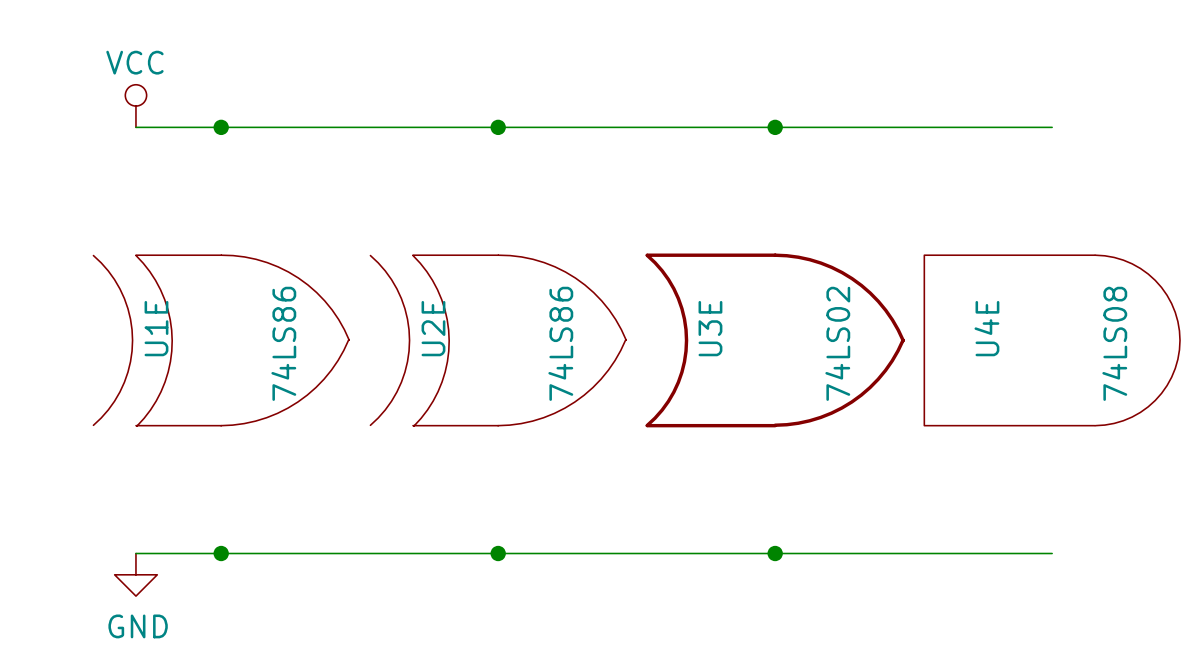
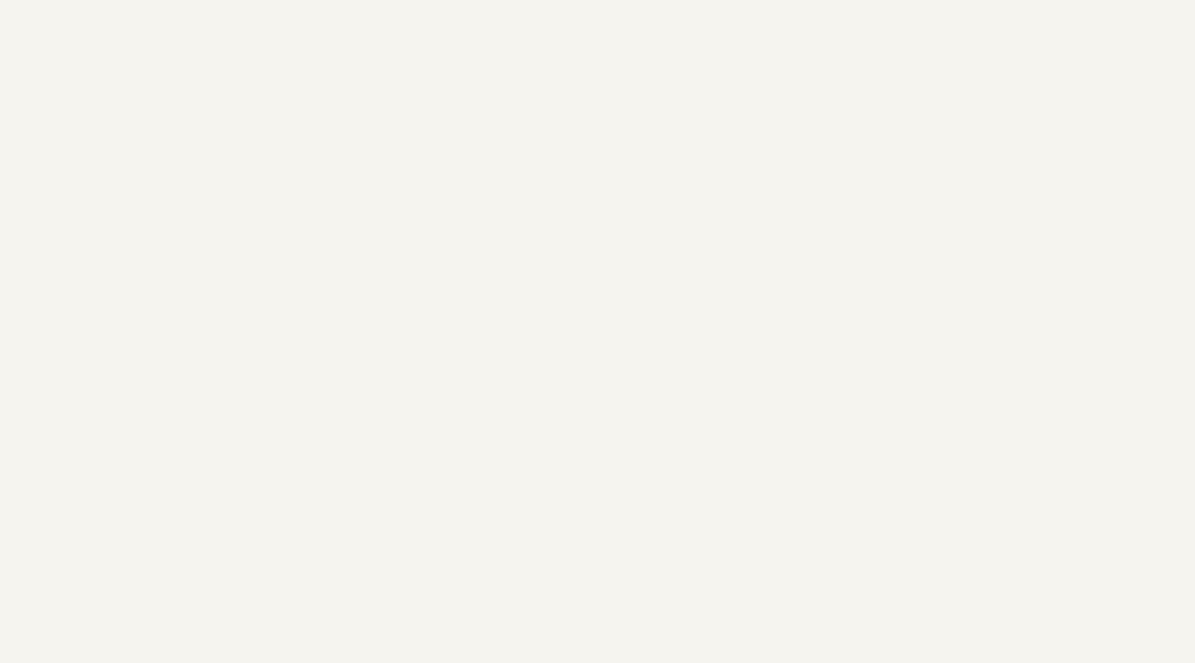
power symbol: VCC (135, 106) -> none
wire: (135, 127) (1052, 127) -> none
junction: (221, 127) -> none
junction: (498, 127) -> none
junction: (775, 127) -> none
U1E: 74LS86 (221, 340) -> none
U2E: 74LS86 (498, 340) -> none
U3E: 74LS02 (775, 340) -> none
U4E: 74LS08 (1052, 340) -> none
wire: (135, 553) (1052, 553) -> none
junction: (221, 553) -> none
junction: (498, 553) -> none
junction: (775, 553) -> none
power symbol: GND (135, 574) -> none

